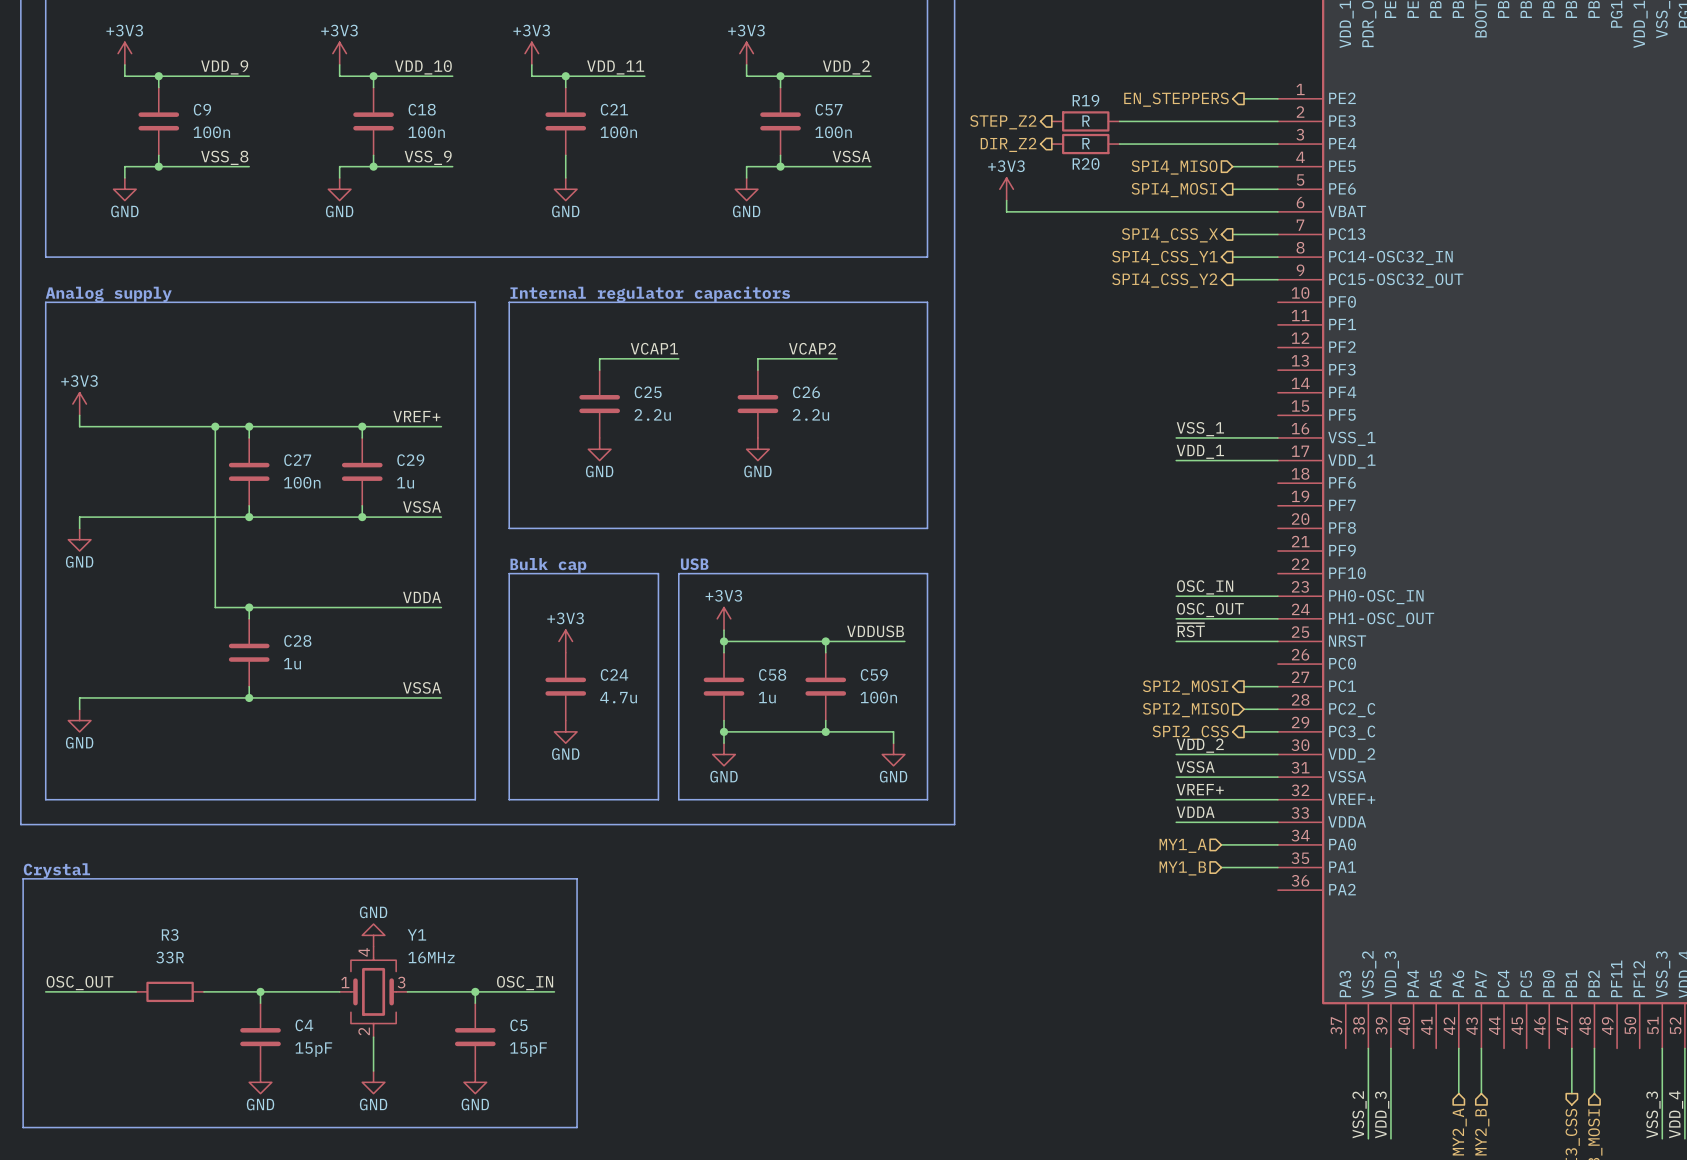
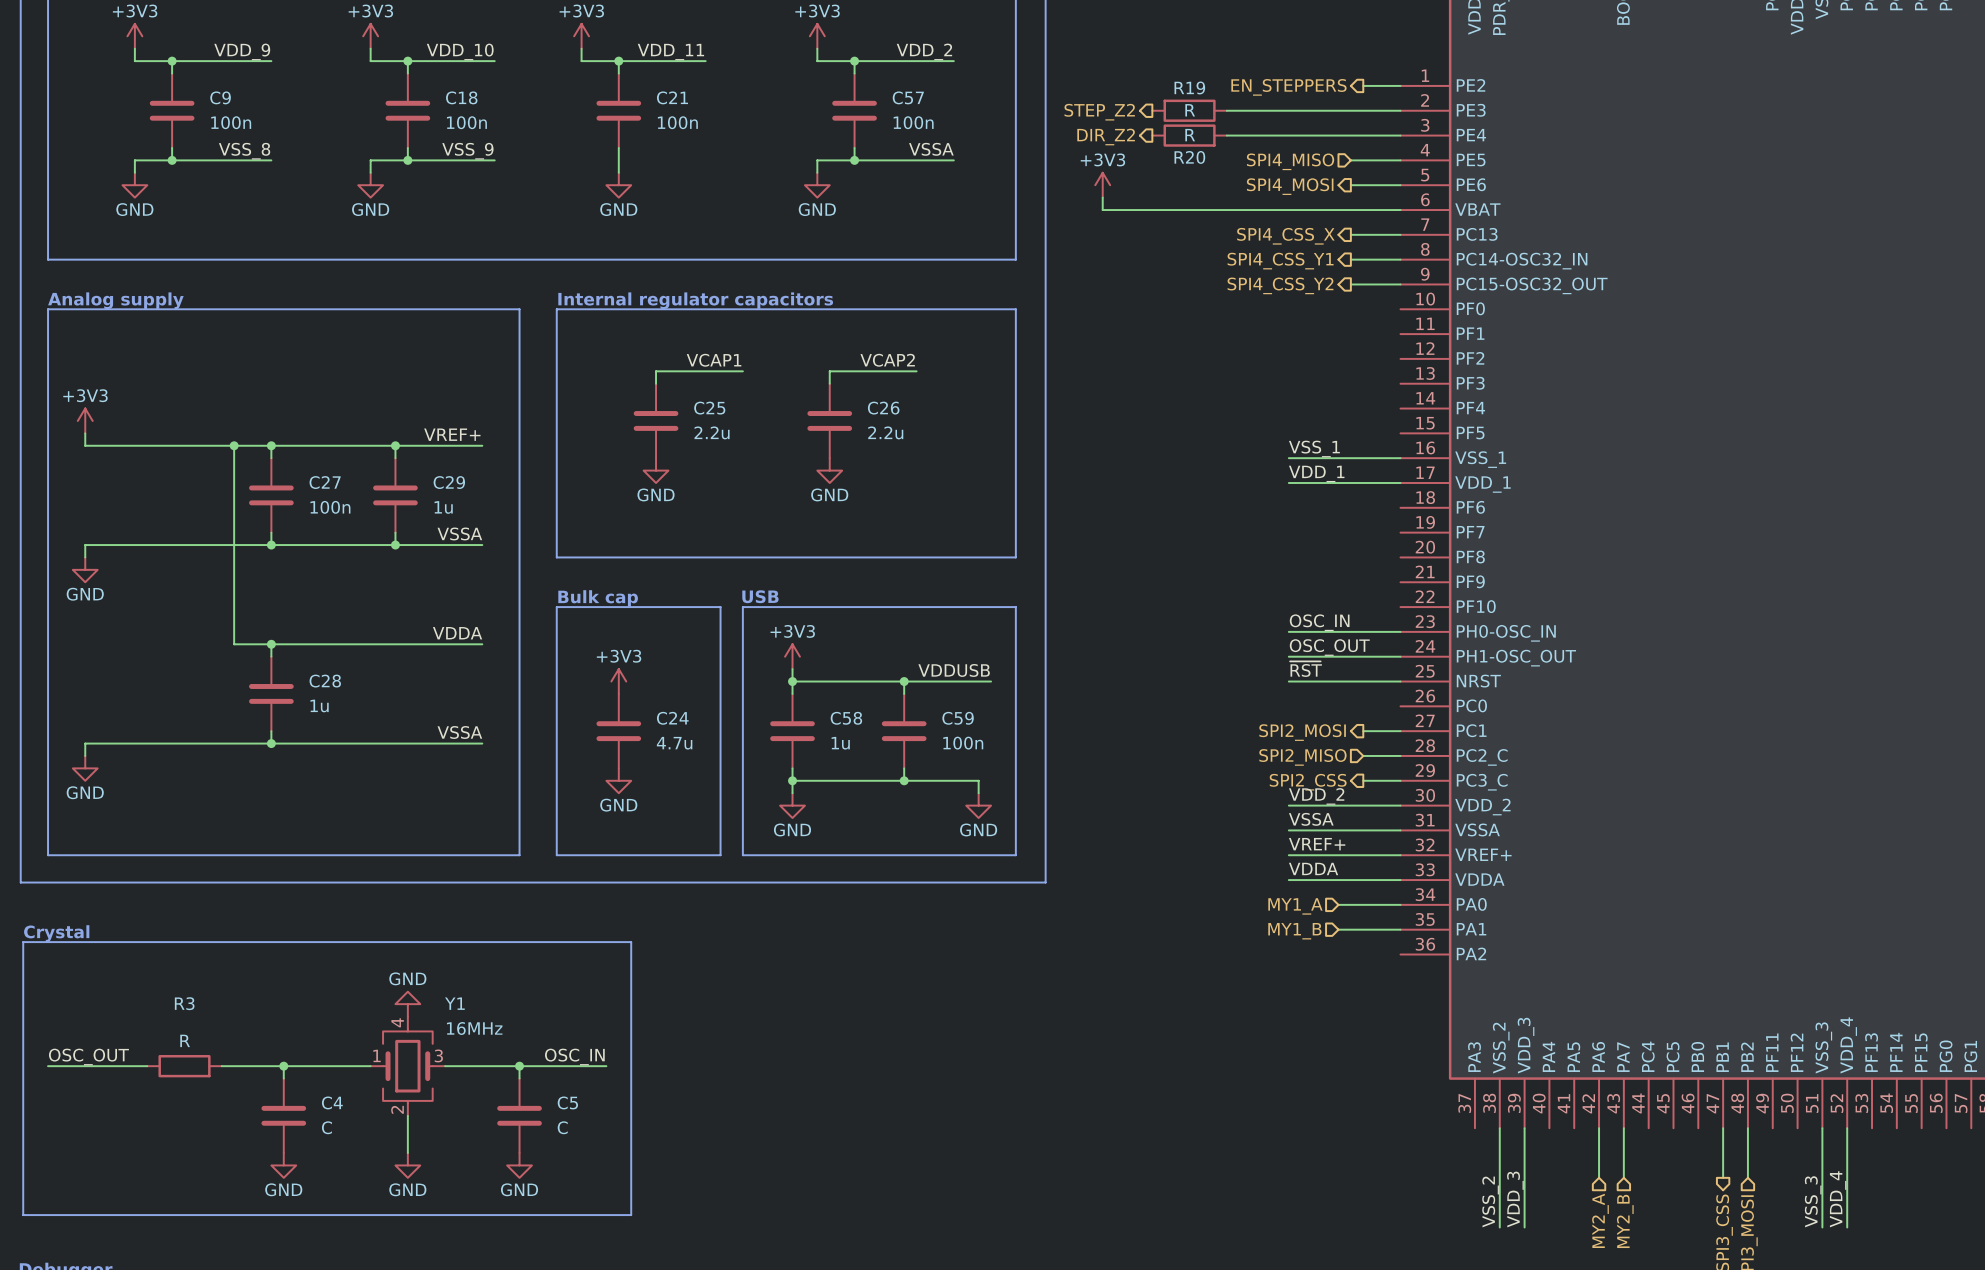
R3 value: 33R (170, 957) -> R (185, 1040)
C4 value: 15pF (313, 1049) -> C (326, 1127)
C5 value: 15pF (528, 1049) -> C (562, 1127)

